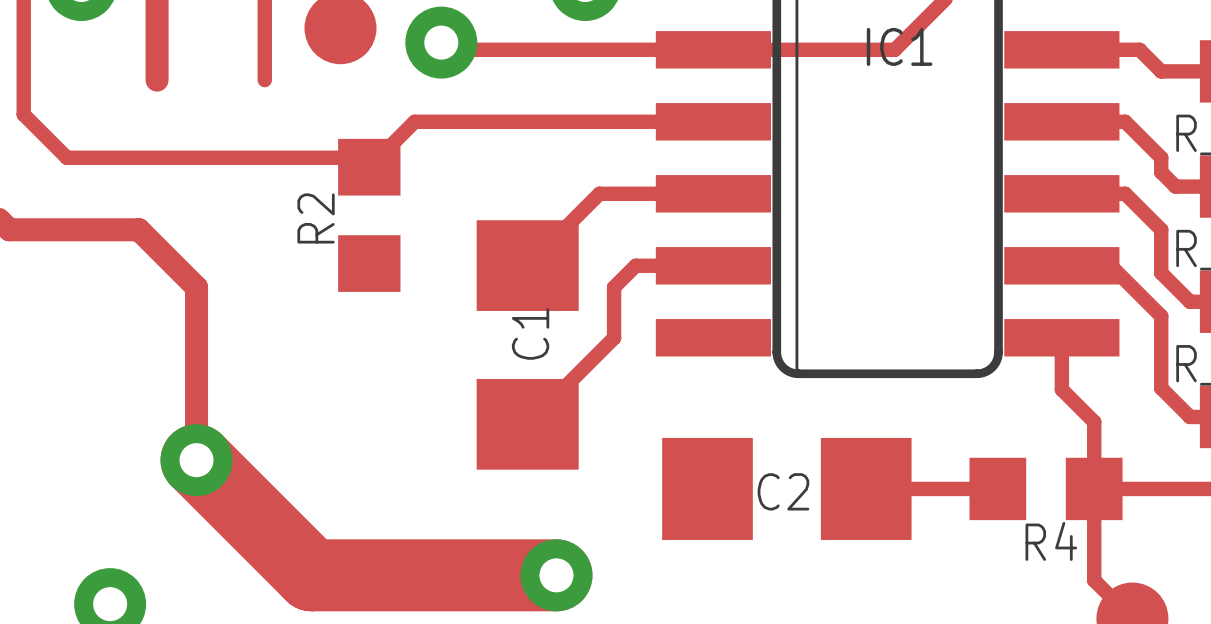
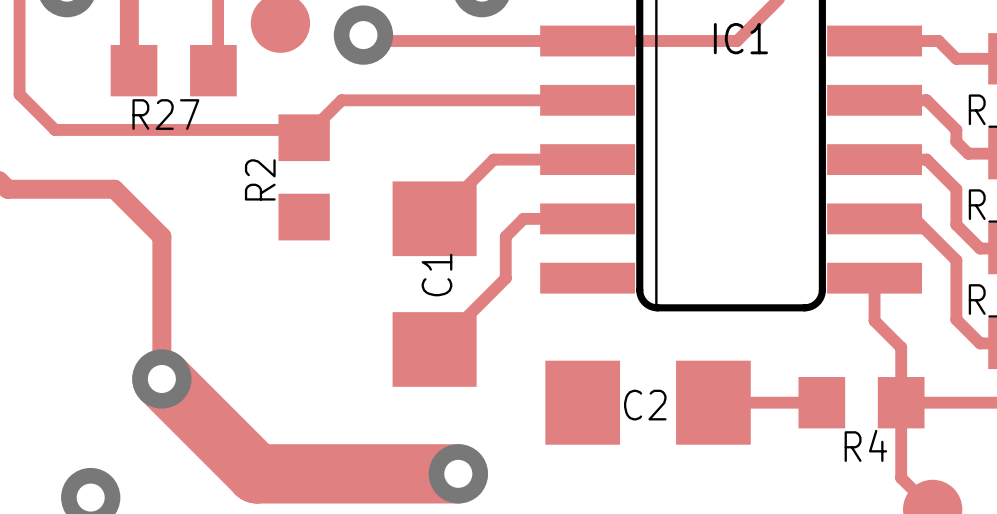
R27: none -> (173, 70)

